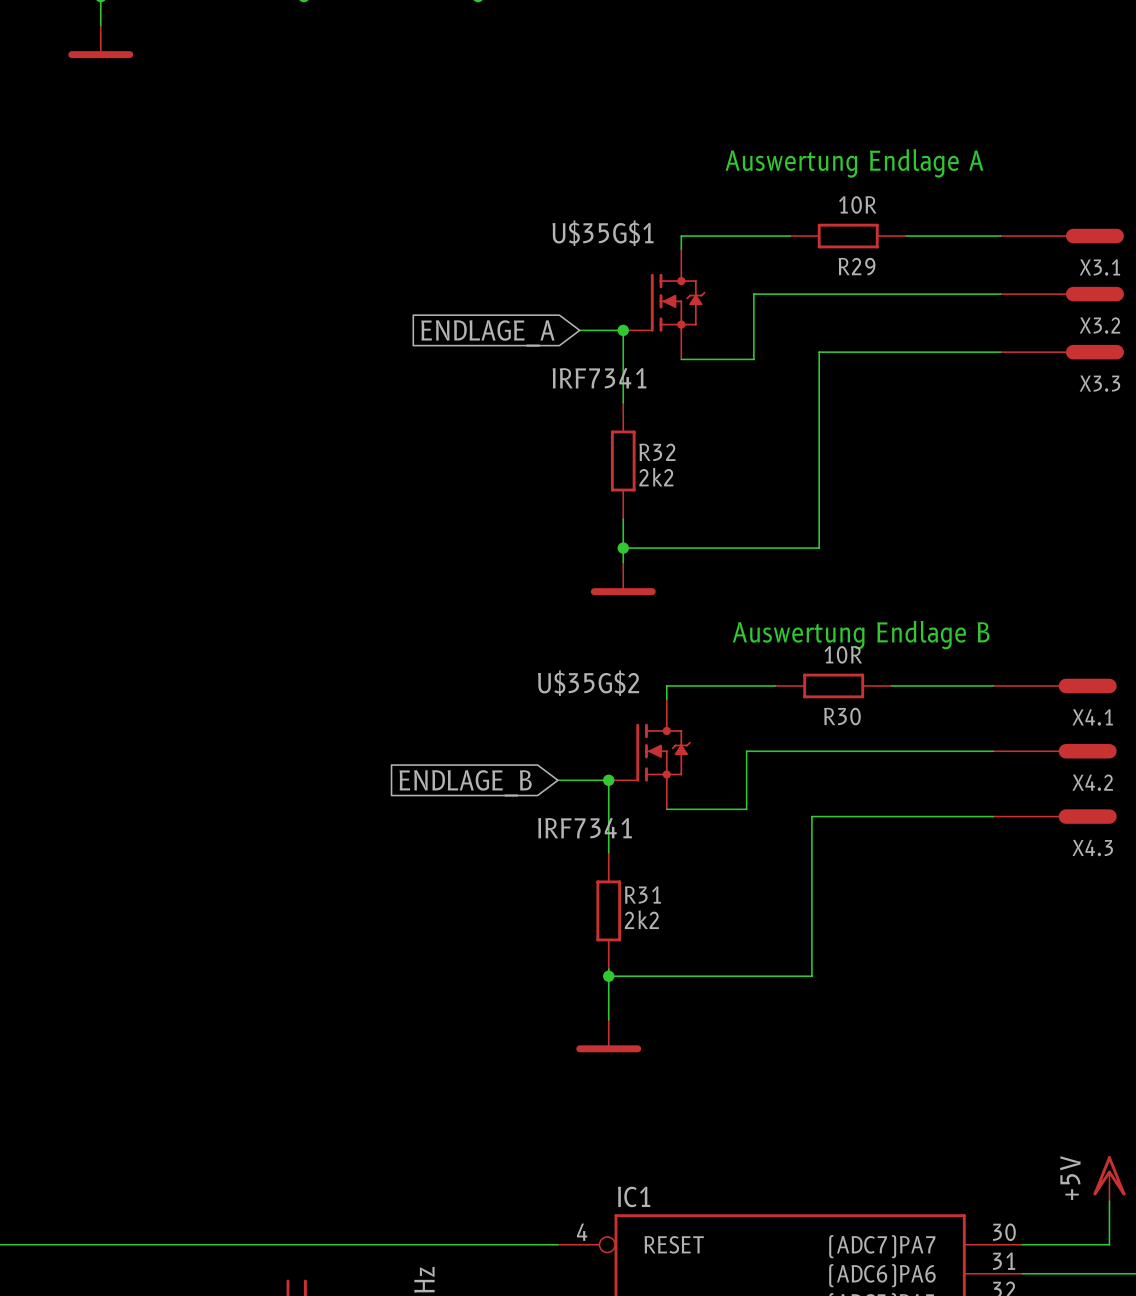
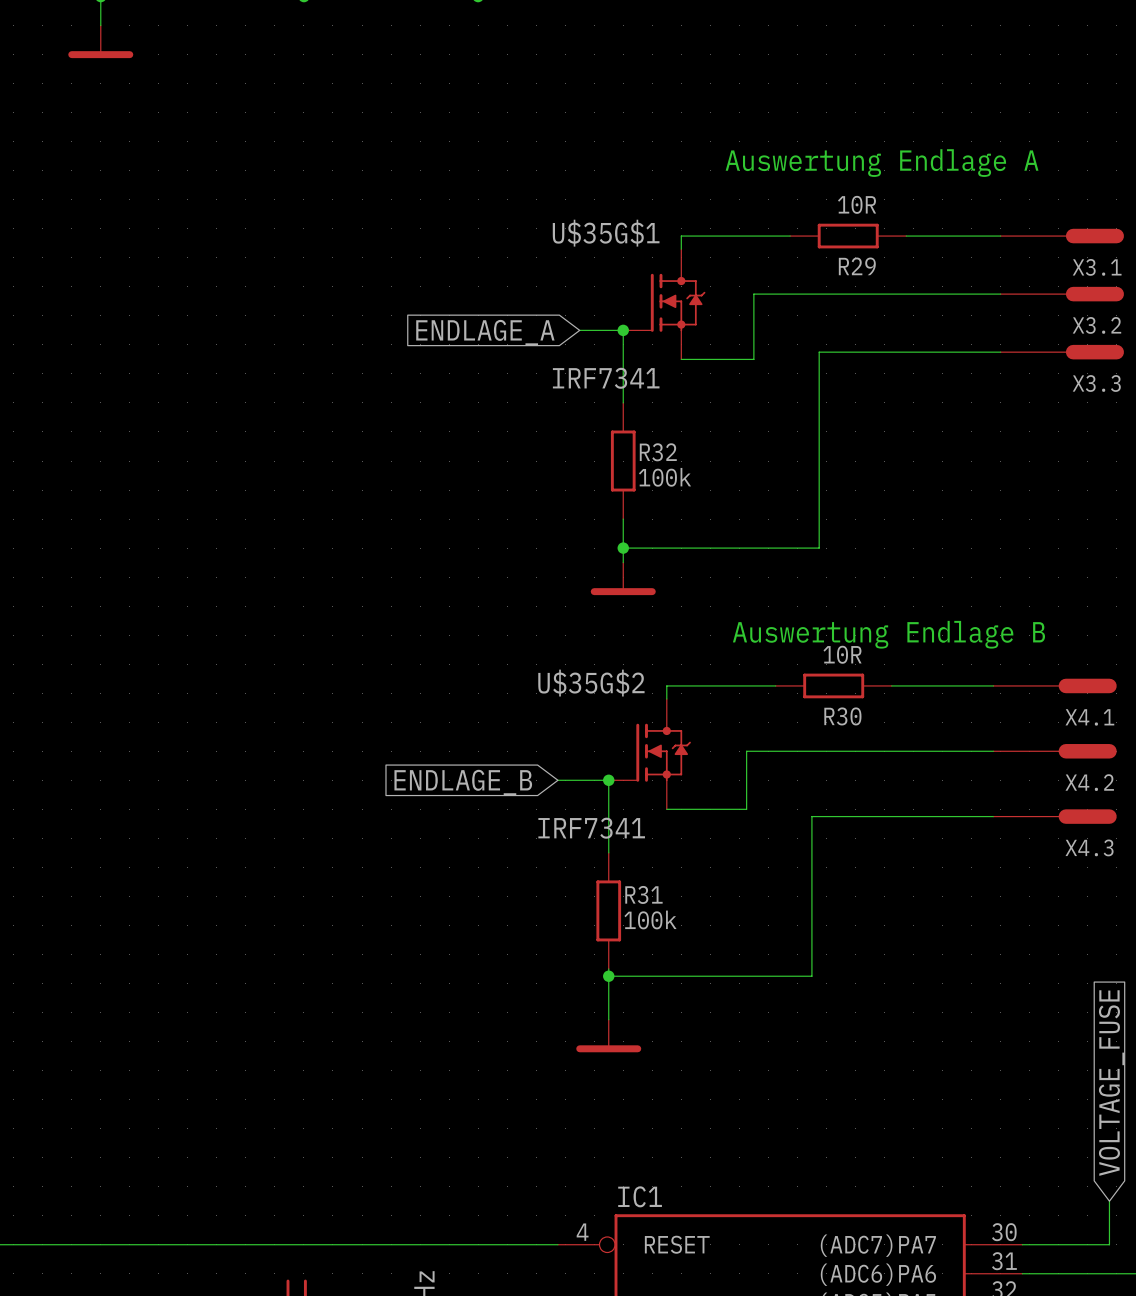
R32 value: 2k2 (656, 477) -> 100k (665, 477)
R31 value: 2k2 (641, 919) -> 100k (650, 919)
global label: none -> VOLTAGE_FUSE (1111, 1083)
power symbol: +5V (1109, 1178) -> none

